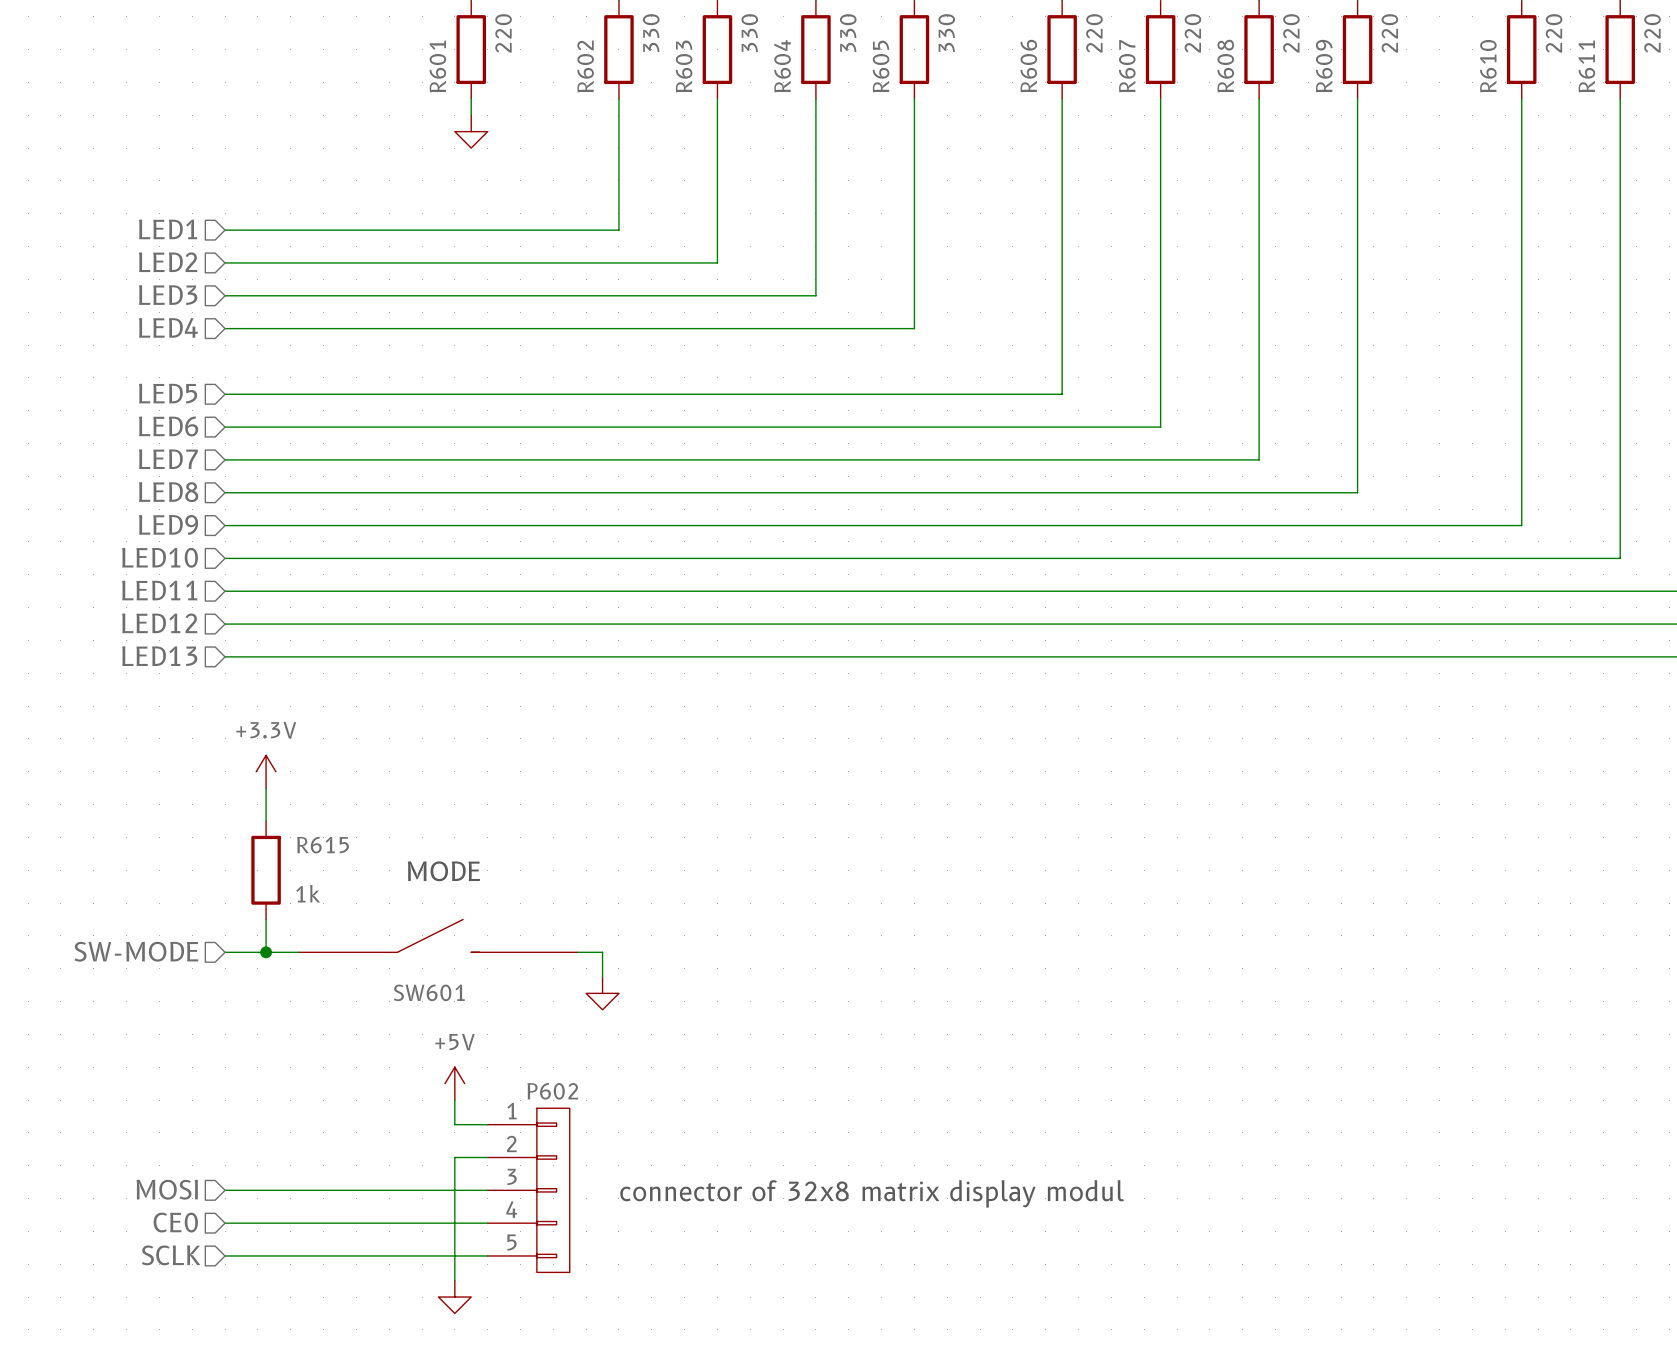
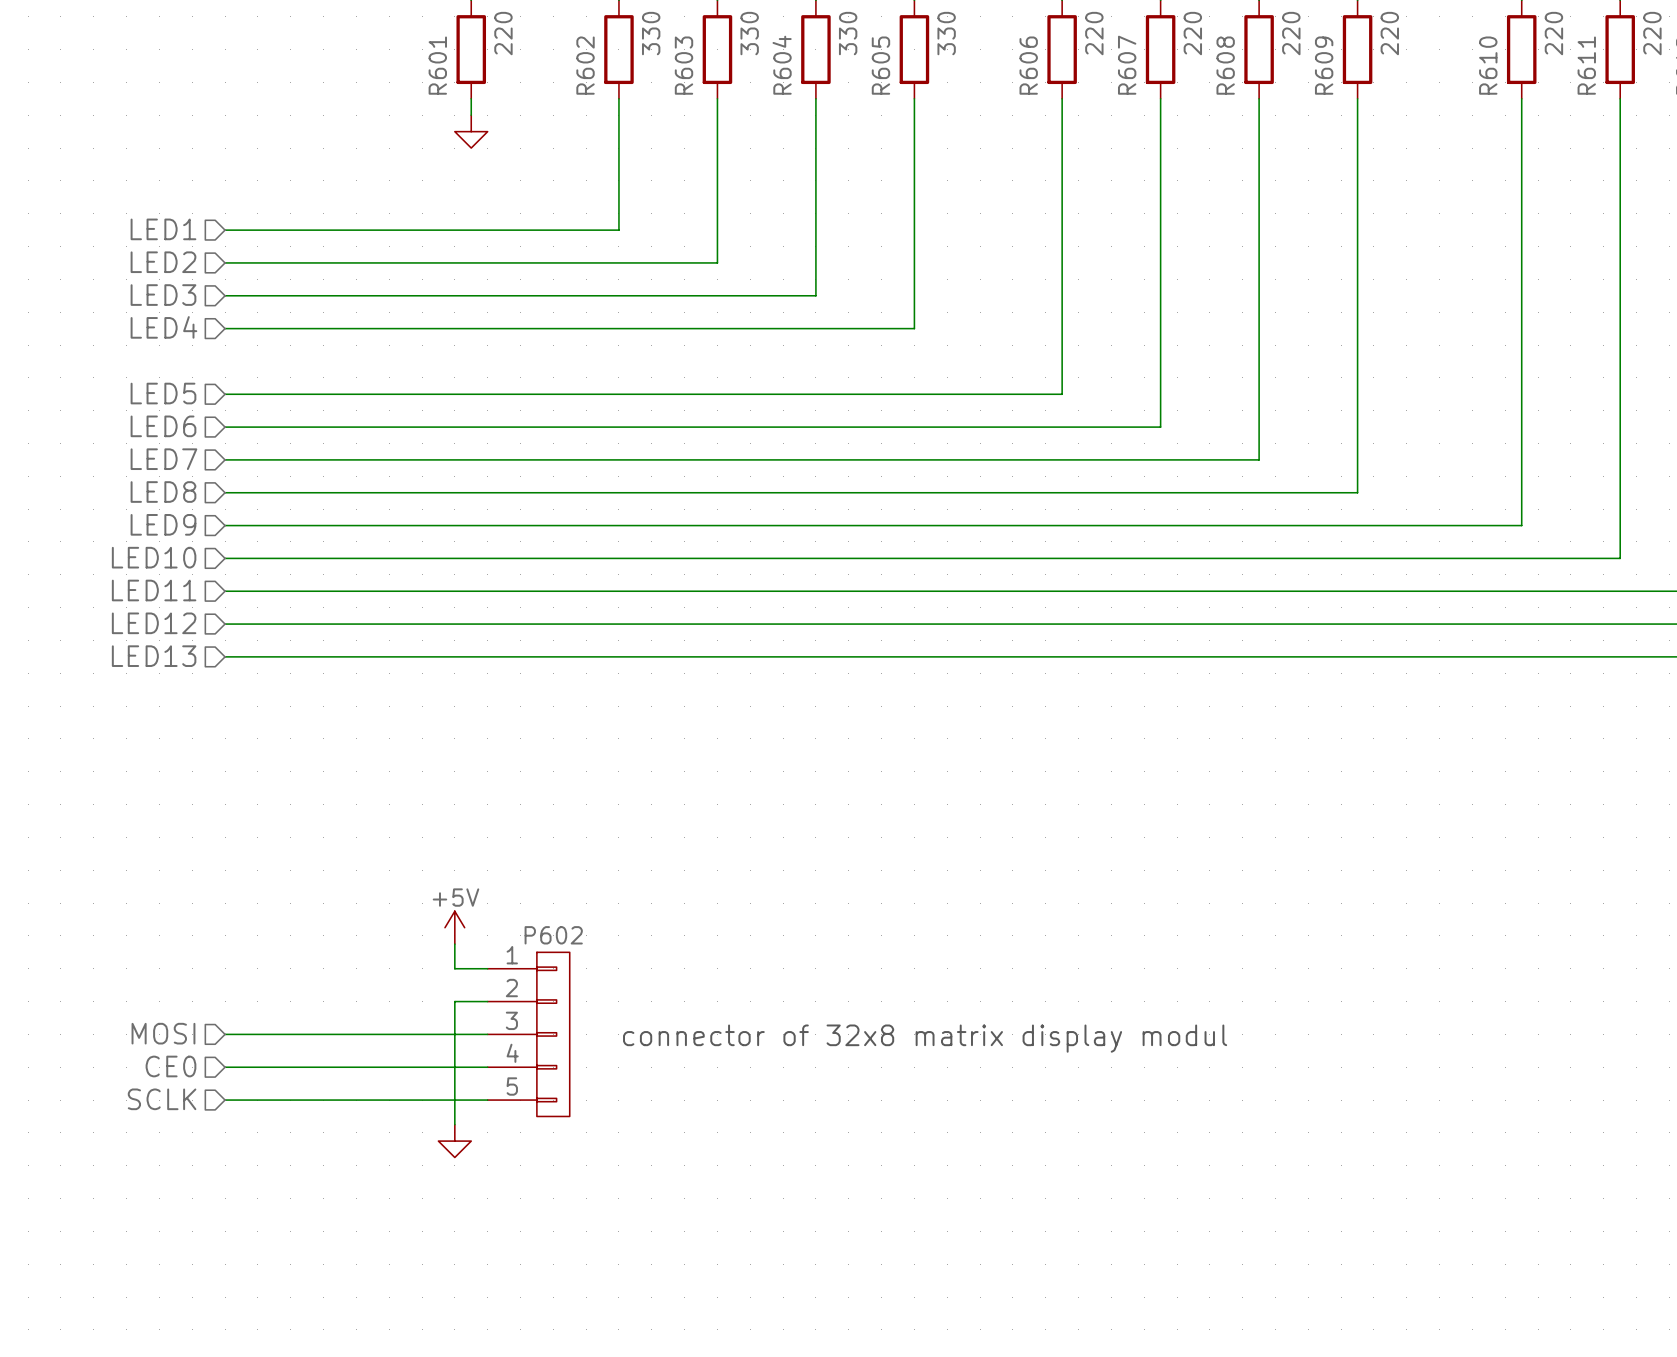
power symbol: +3.3V (266, 771) -> none
wire: (266, 788) (266, 821) -> none
R615: 1k (266, 870) -> none
text: MODE (443, 871) -> none
wire: (266, 919) (266, 952) -> none
SW601: (438, 935) -> none
wire: none -> (454, 944) (454, 968) (487, 968)
hierarchical label: SW-MODE (136, 951) -> none
wire: (225, 952) (298, 952) -> none
junction: (266, 952) -> none
wire: (577, 952) (602, 952) (602, 976) -> none
power symbol: (602, 993) -> none
wire: none -> (487, 1001) (454, 1001) (454, 1100)
power symbol text position: +5V (455, 1042) -> +5V (456, 897)
power symbol position: +5V (454, 1083) -> +5V (454, 927)
wire: (454, 1124) (487, 1124) -> none
power symbol: none -> (454, 1141)
wire: (487, 1157) (454, 1157) (454, 1280) -> none
hierarchical label position: MOSI (167, 1189) -> MOSI (163, 1033)
wire: (225, 1190) (487, 1190) -> (225, 1034) (487, 1034)
P602 position: (528, 1190) -> (528, 1034)
text position: connector of 32x8 matrix display modul (872, 1193) -> connector of 32x8 matrix display modul (925, 1038)
hierarchical label position: CE0 (175, 1222) -> CE0 (170, 1066)
wire: (225, 1223) (487, 1223) -> (225, 1067) (487, 1067)
hierarchical label position: SCLK (171, 1255) -> SCLK (162, 1099)
wire: (225, 1255) (487, 1255) -> (225, 1100) (487, 1100)
power symbol: (454, 1297) -> none

